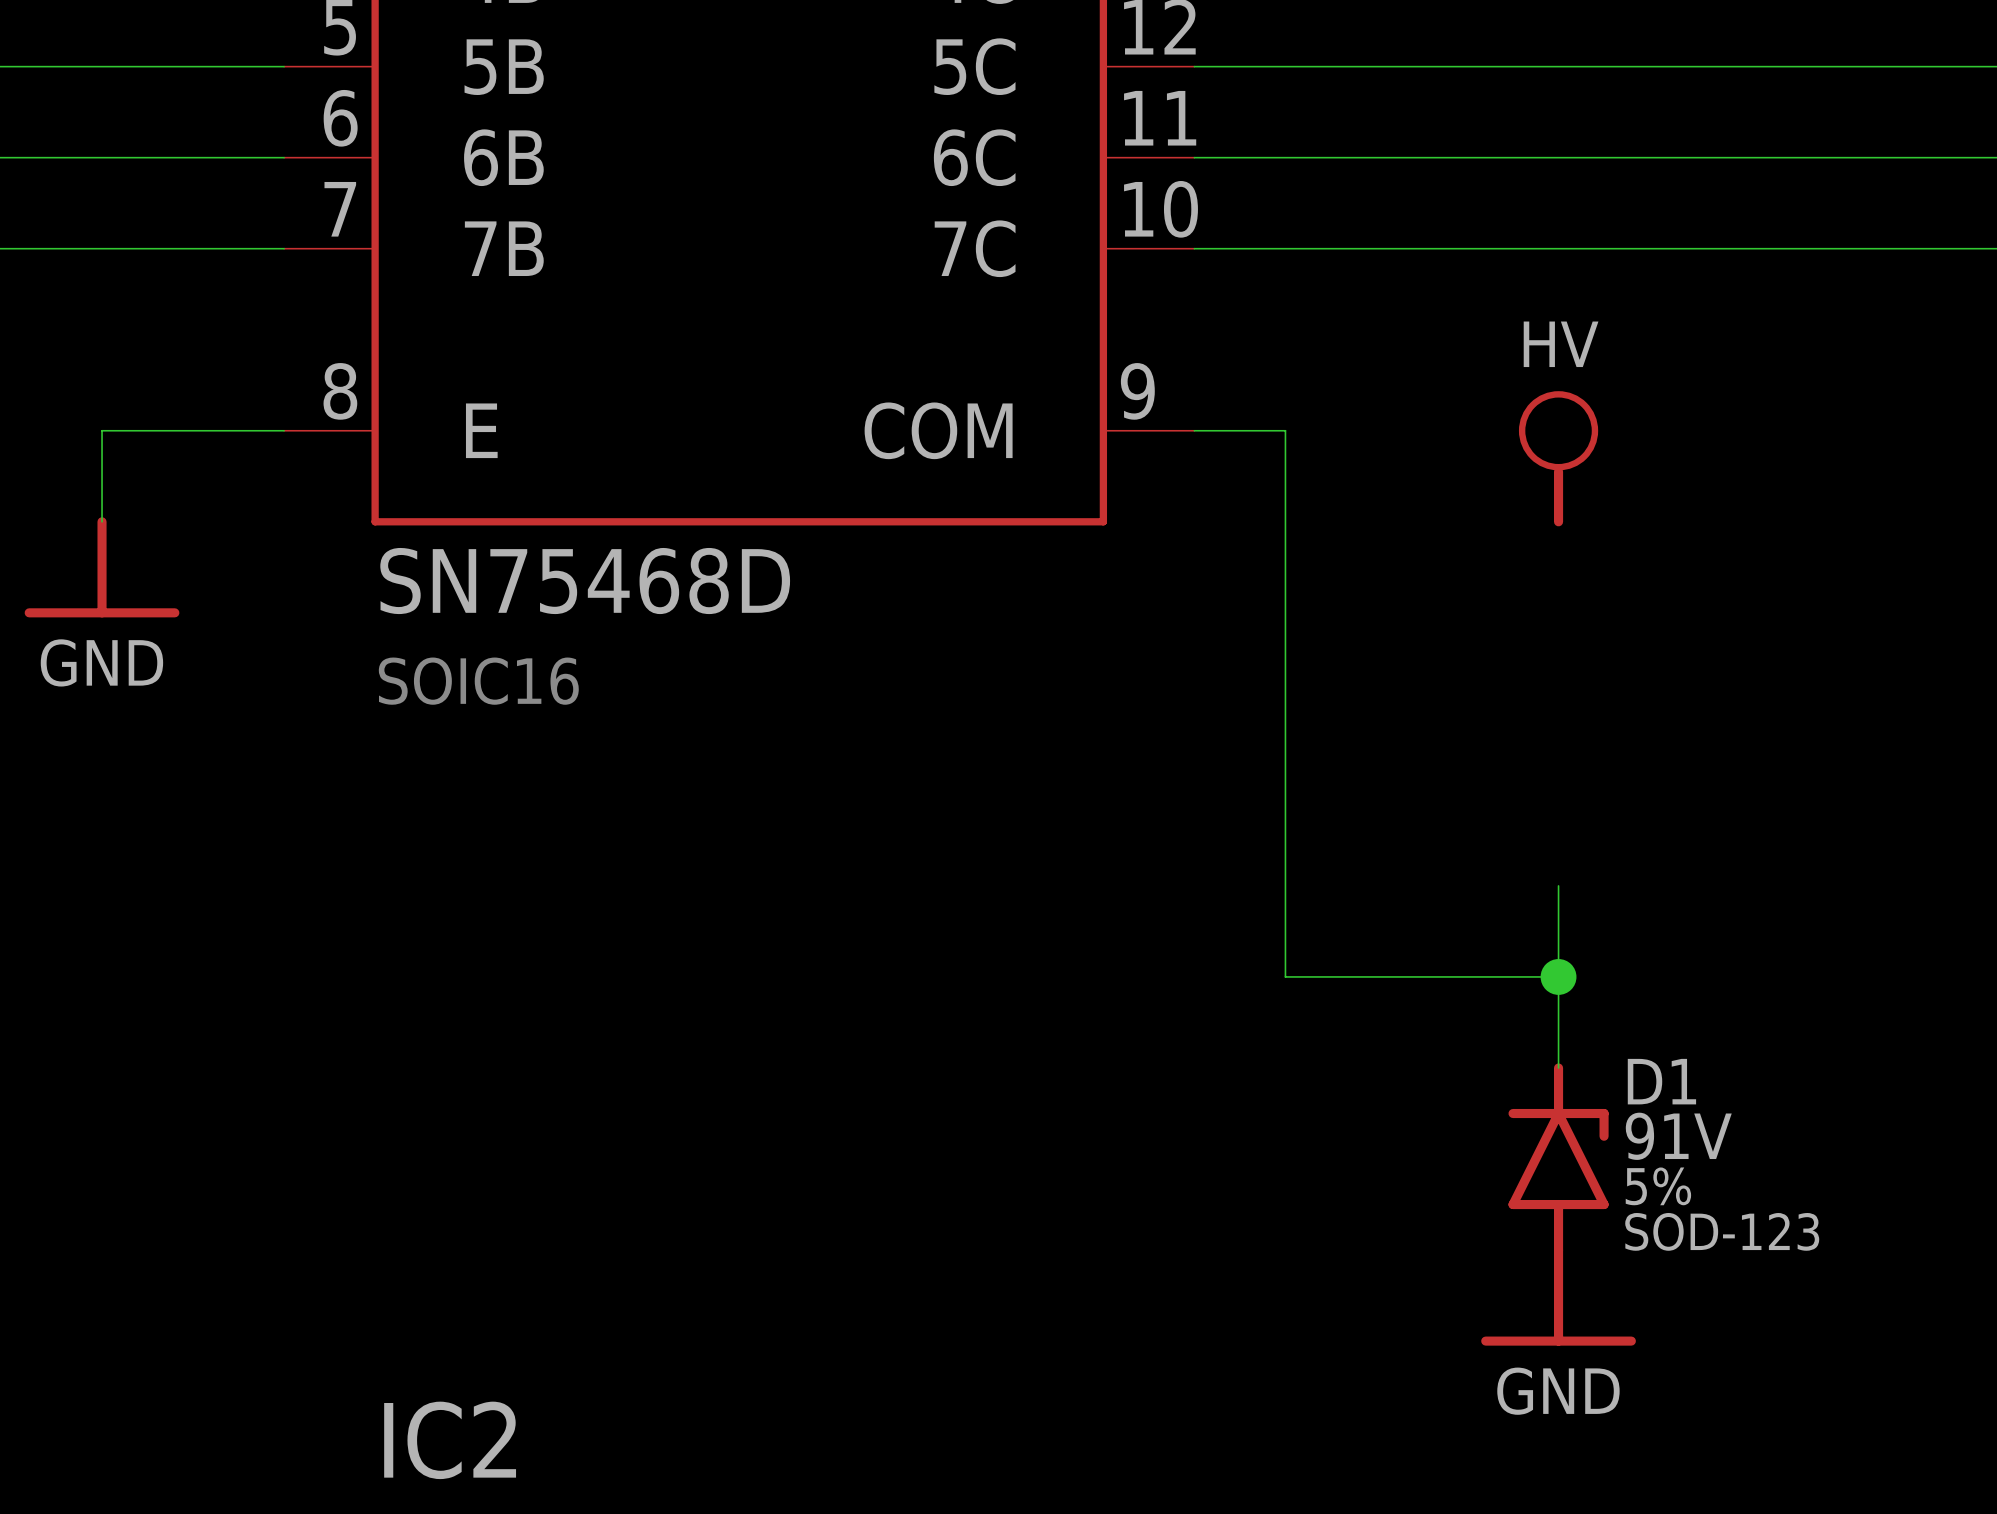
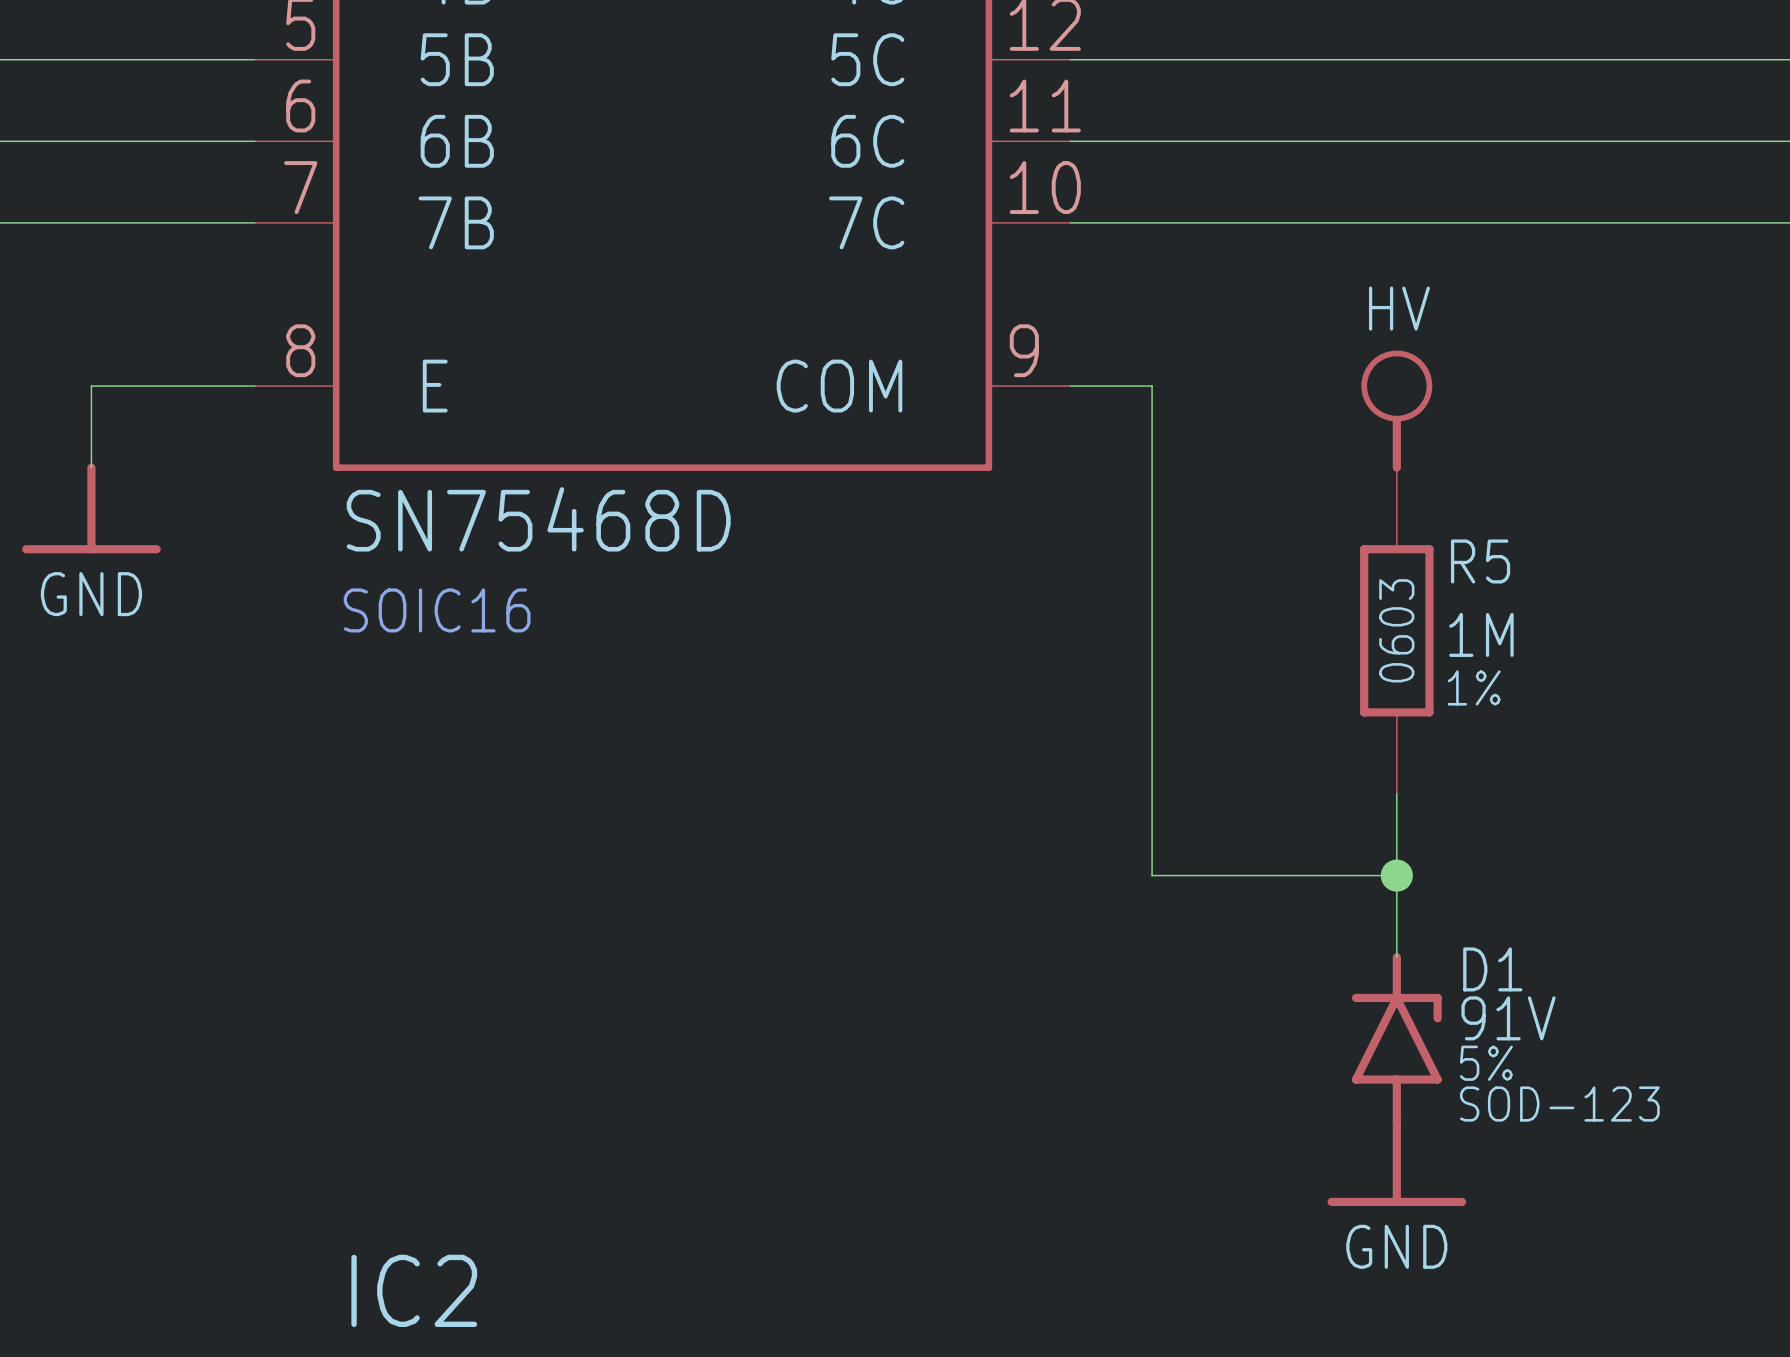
R5: none -> 1M (1396, 630)

